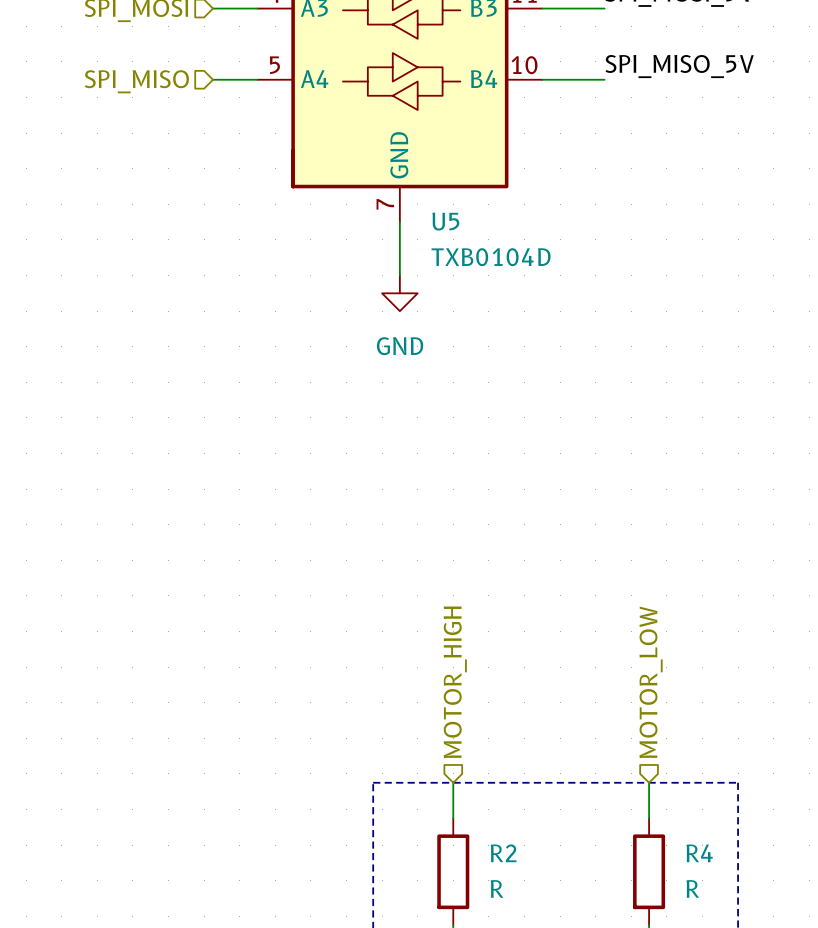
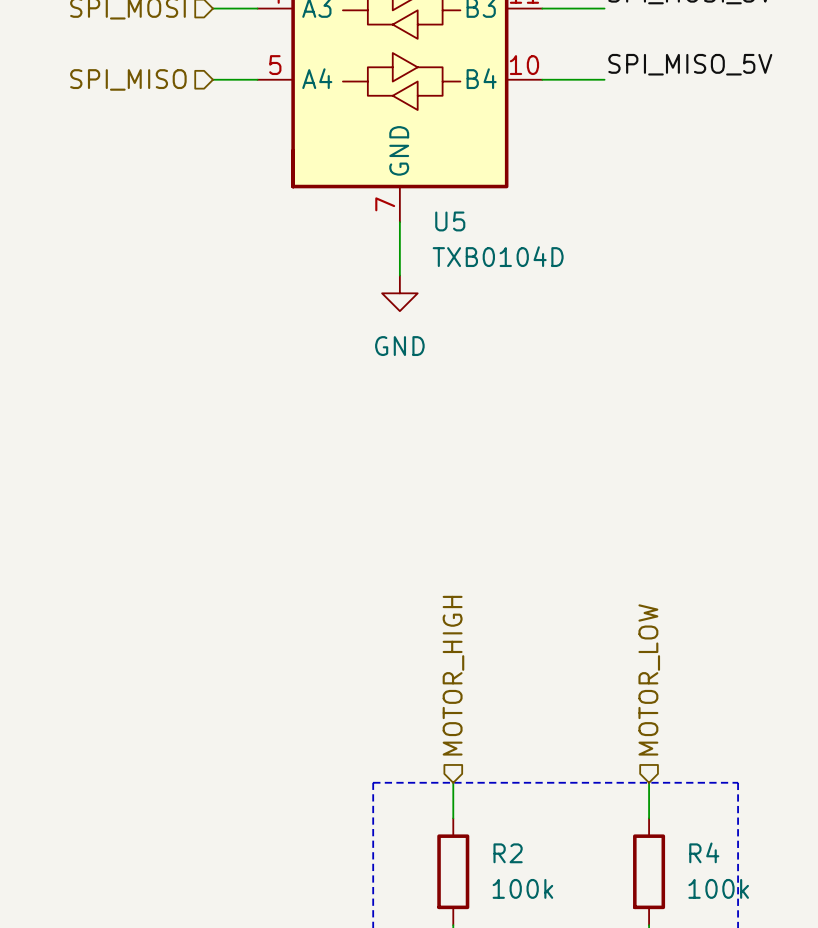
R2 value: R (497, 888) -> 100k (522, 888)
R4 value: R (692, 888) -> 100k (718, 888)

